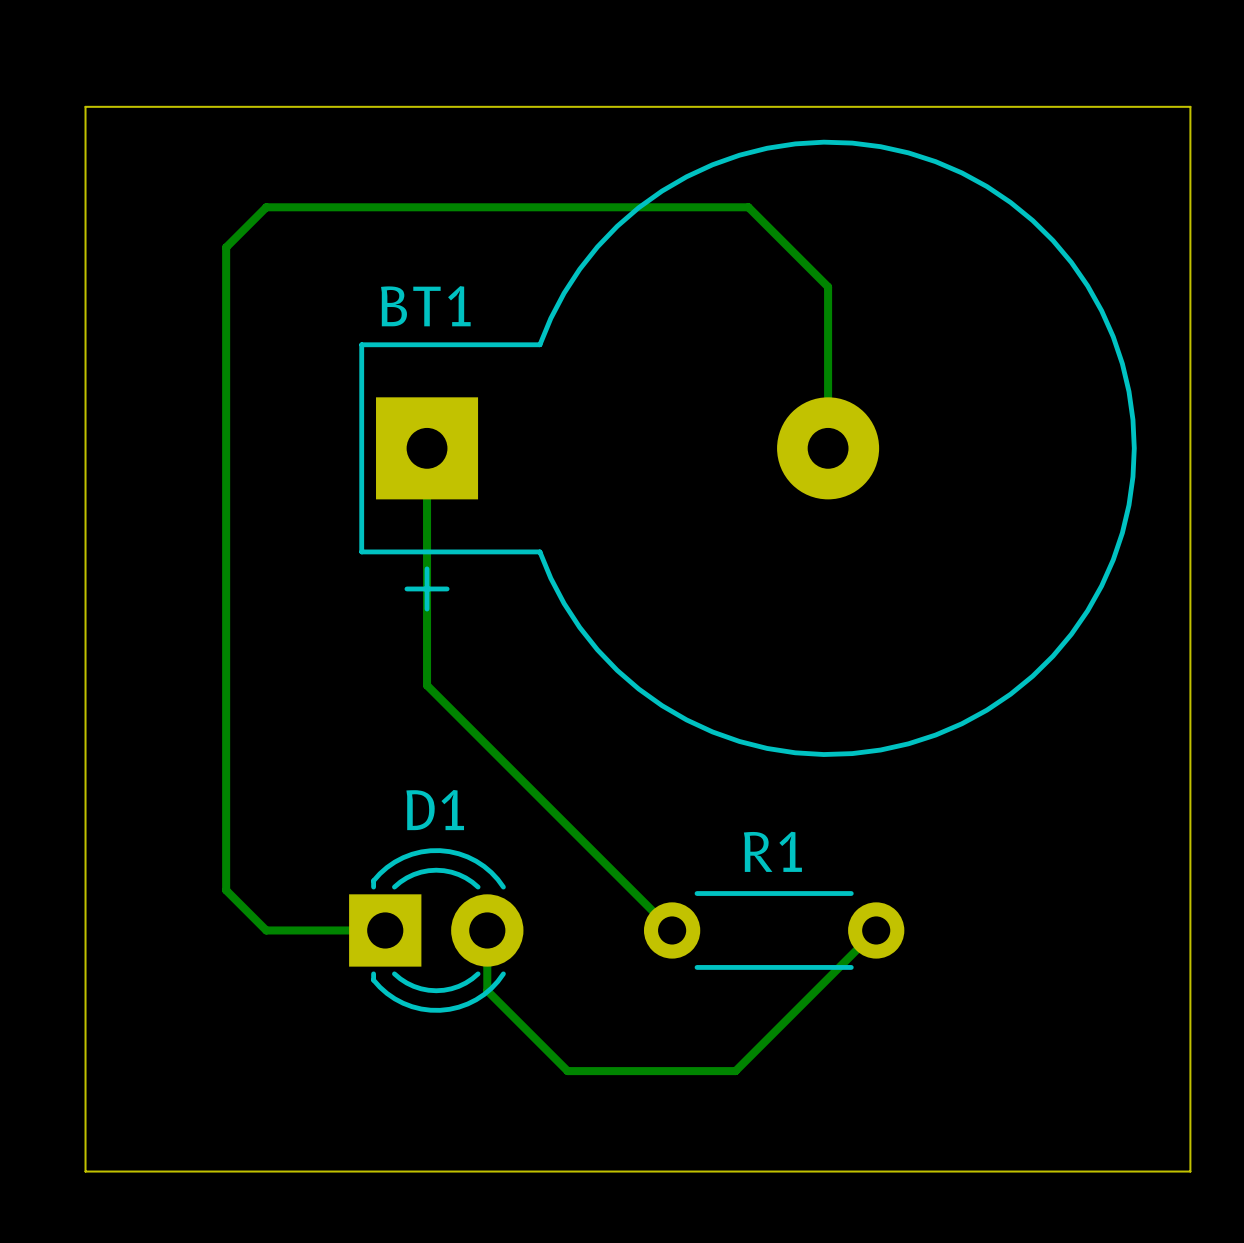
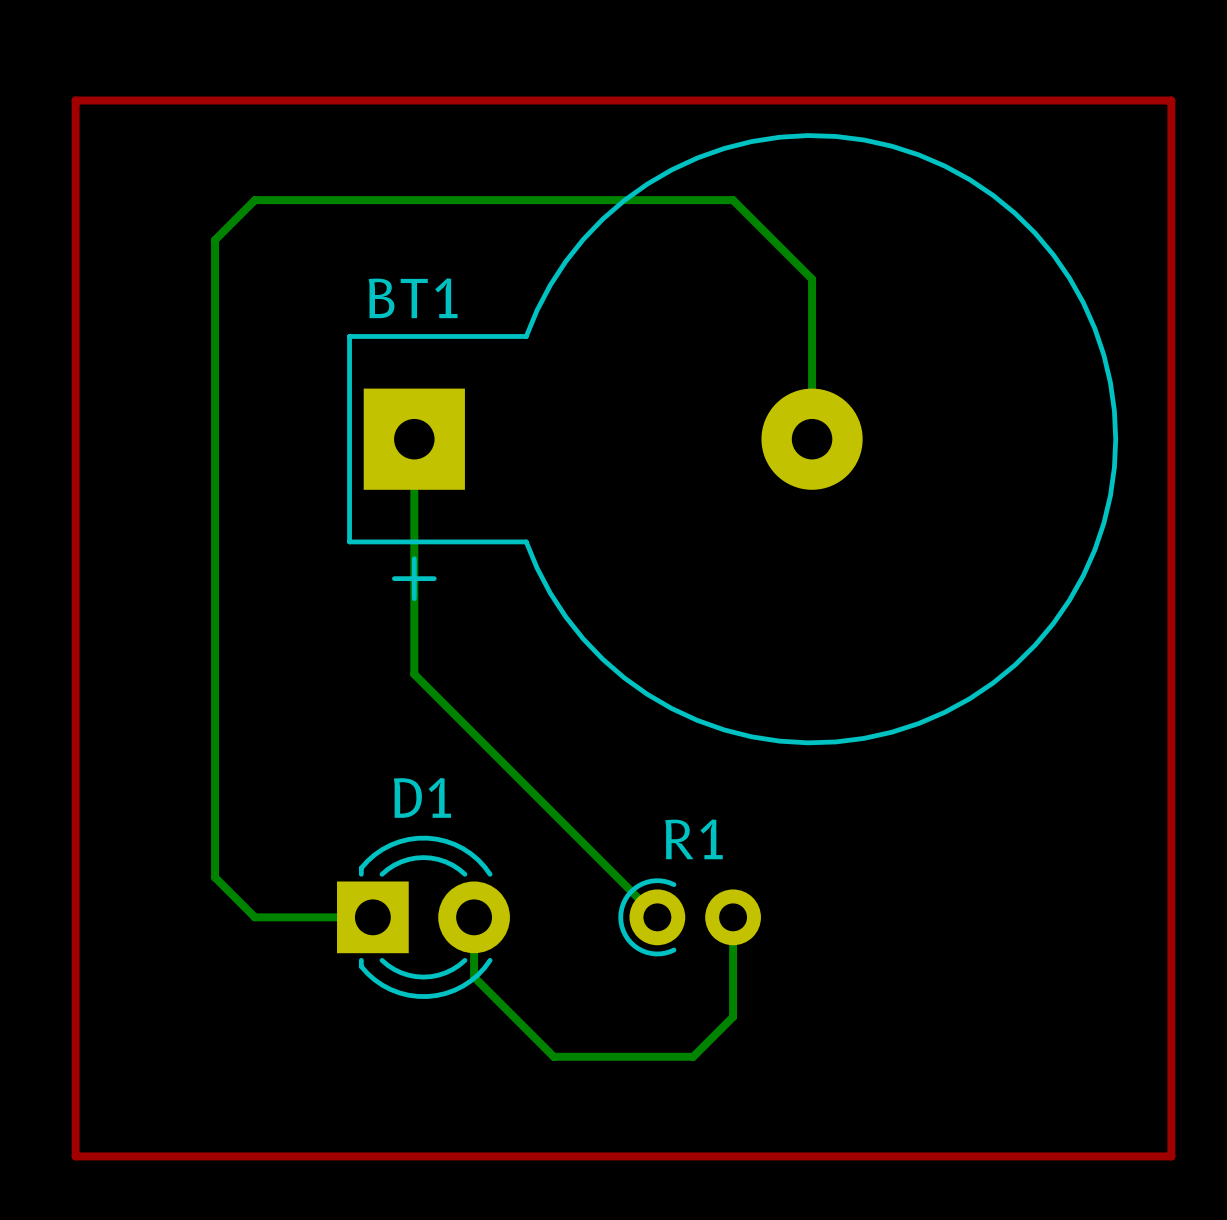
board edge: (85, 106) (1190, 106) (1190, 1171) (85, 1171) (85, 106) -> none
top track: none -> (75, 100) (1171, 100) (1171, 1156) (75, 1156) (75, 100)
R1 footprint: [643, 891, 905, 970] -> [618, 878, 761, 957]
bottom track: (876, 930) (735, 1071) (708, 1071) -> (733, 917) (733, 1016) (693, 1056)

